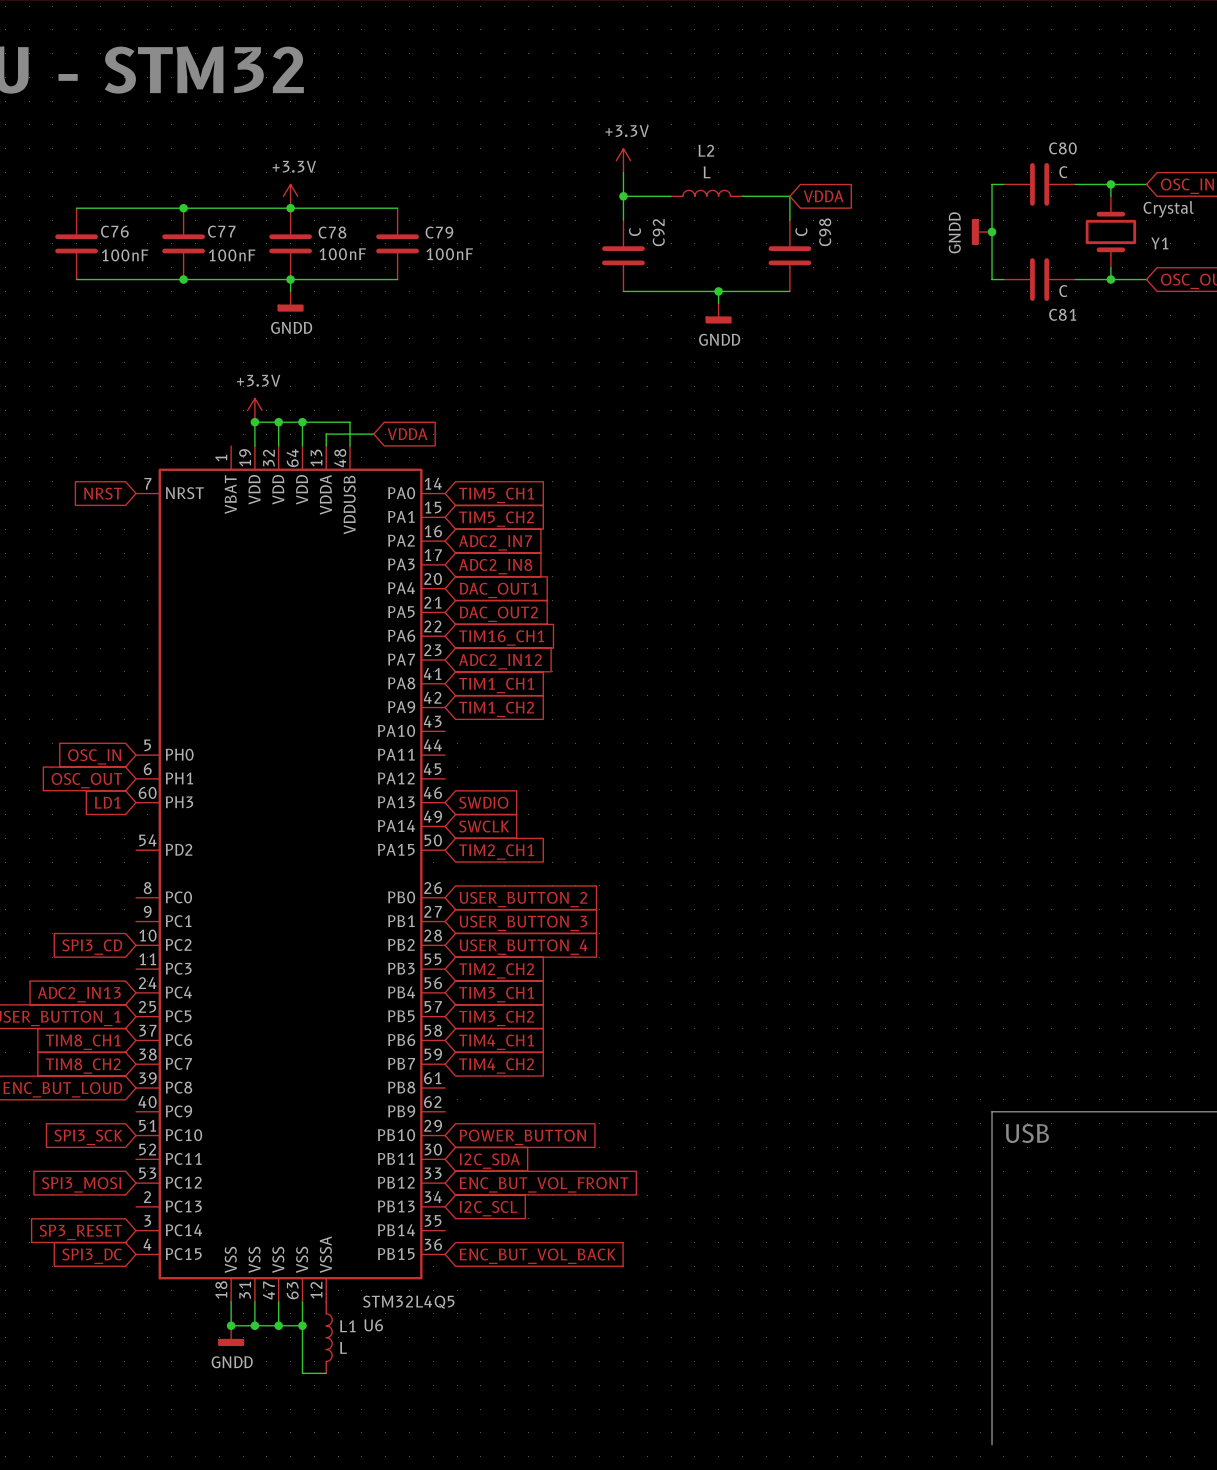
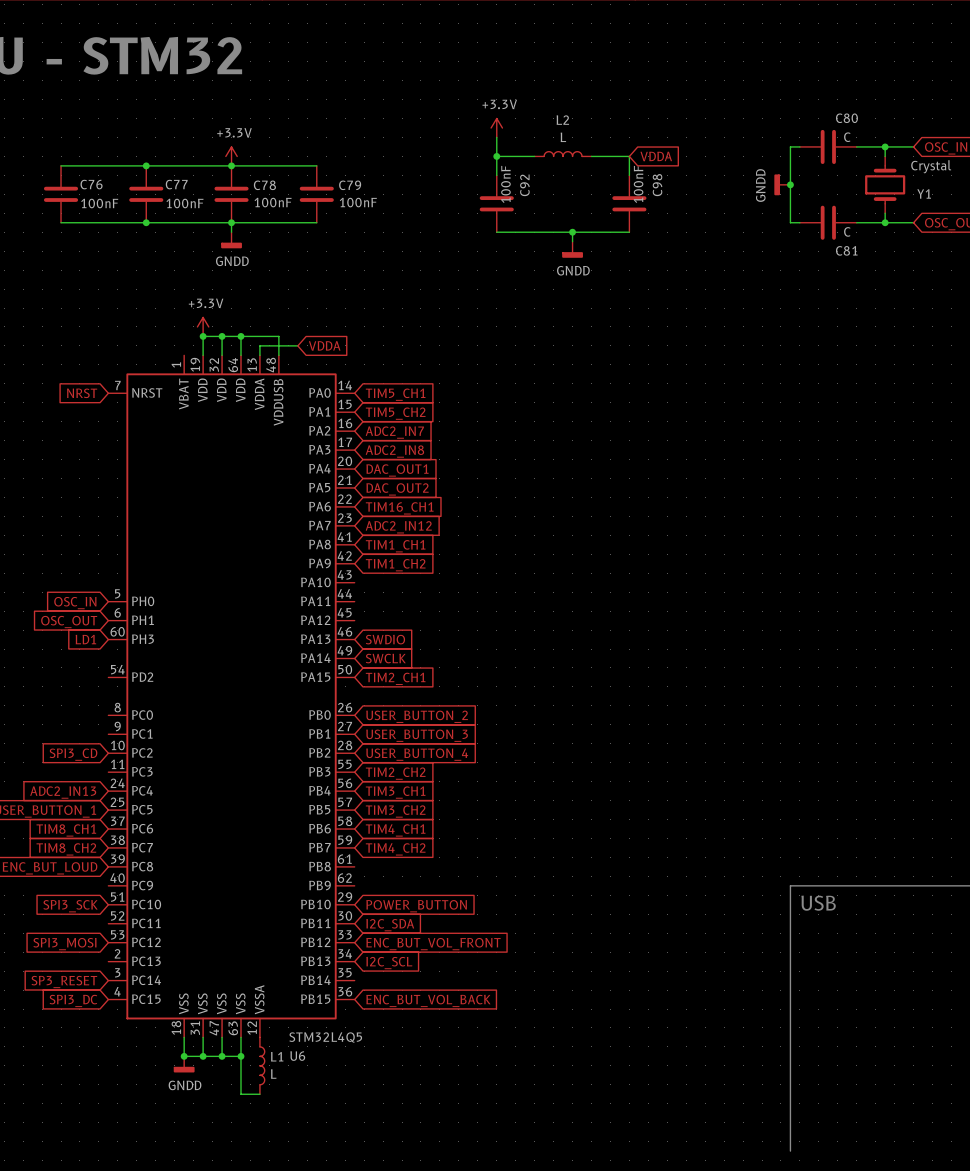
C92 value: C (634, 231) -> 100nF (505, 184)
C98 value: C (801, 231) -> 100nF (638, 184)

